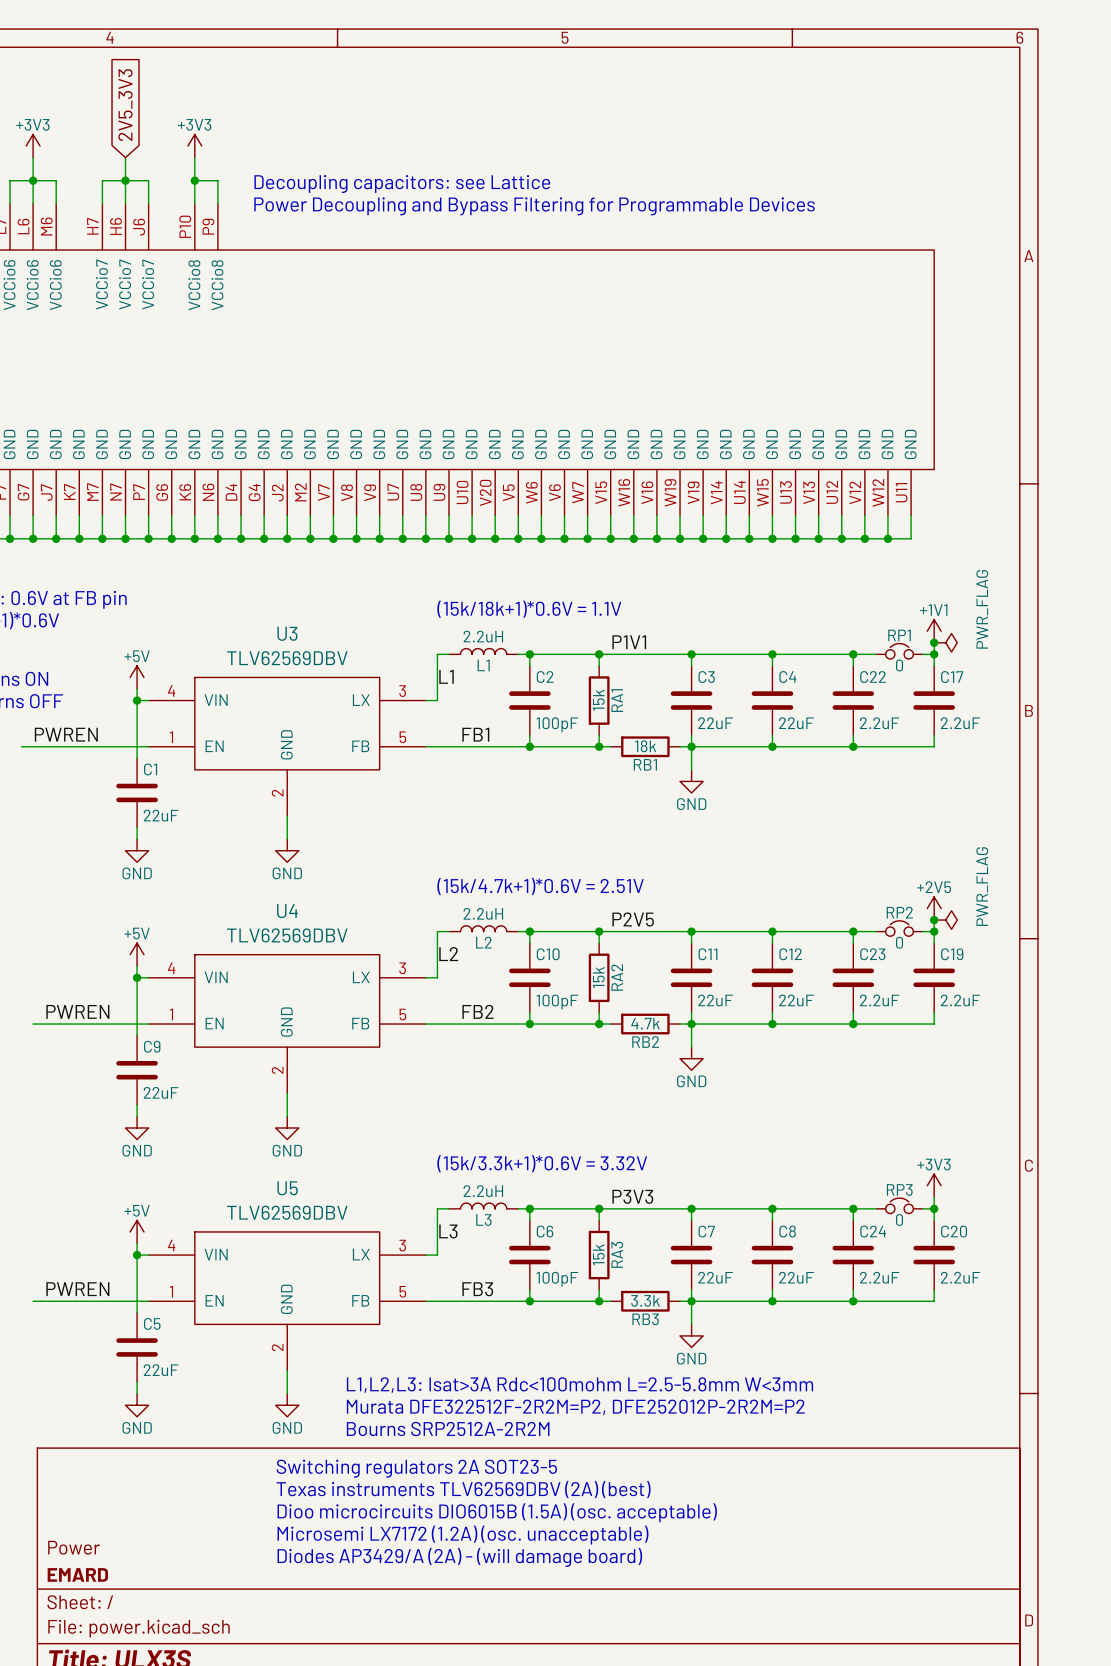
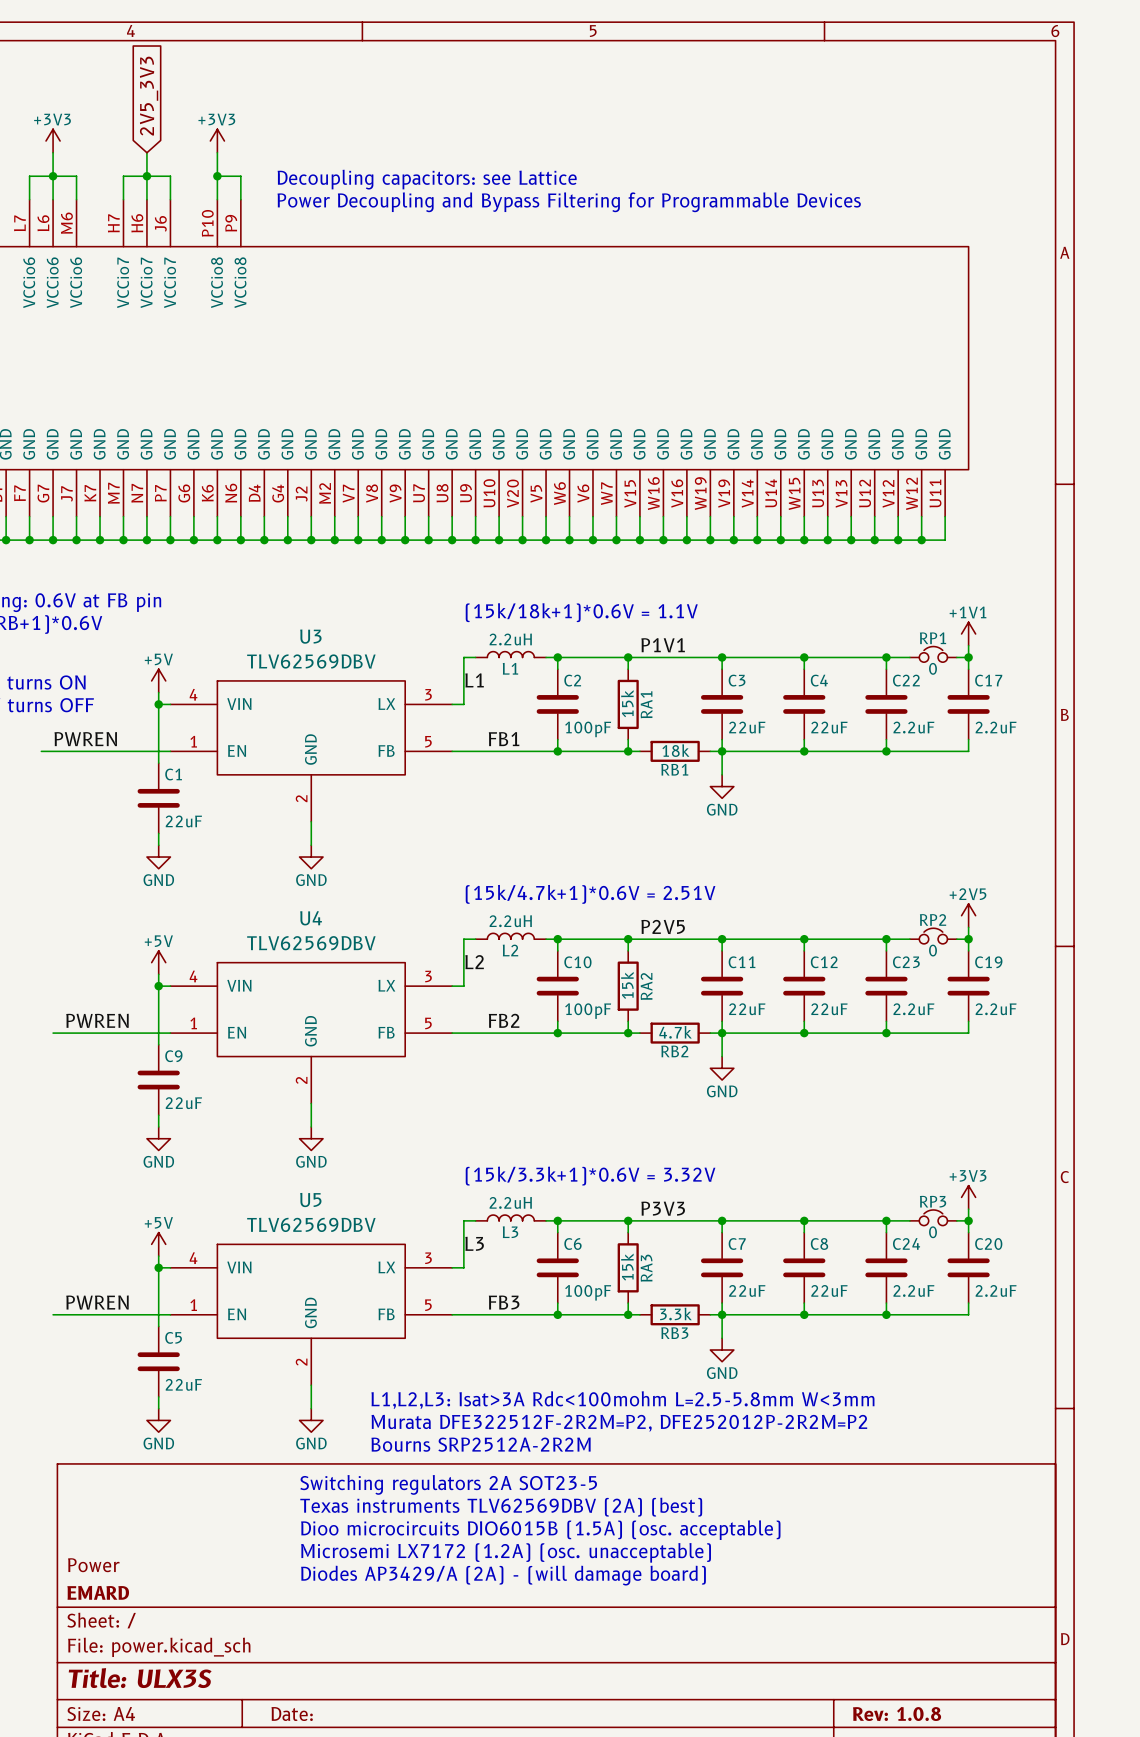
junction: (934, 642) -> none
power symbol: PWR_FLAG (945, 642) -> none
junction: (934, 920) -> none
power symbol: PWR_FLAG (945, 920) -> none

